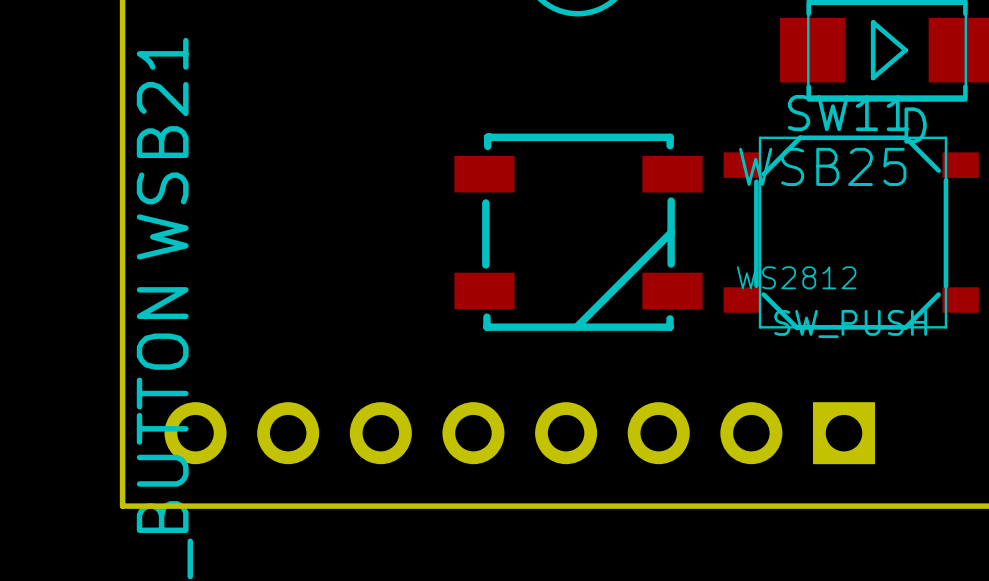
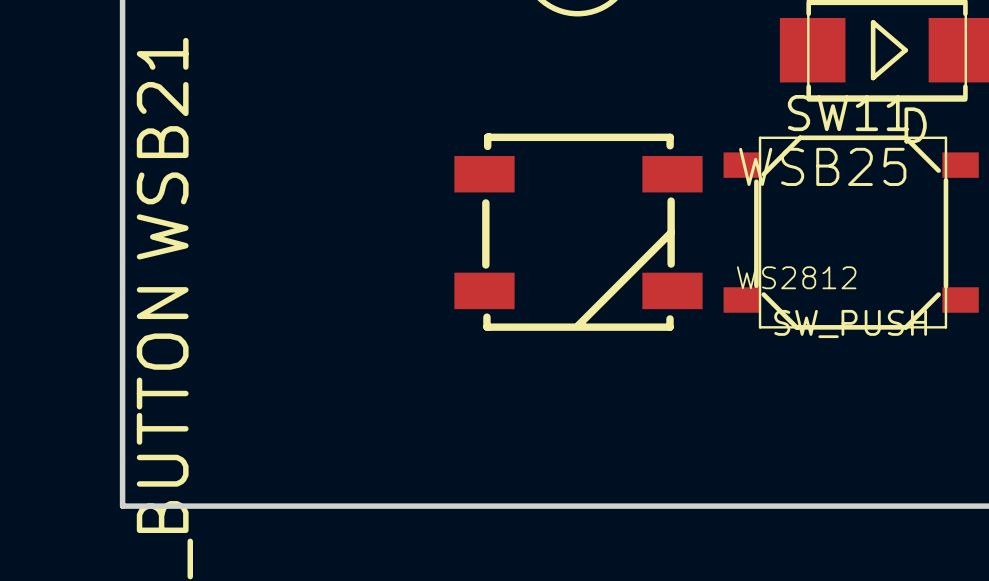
part: (519, 433) -> none

